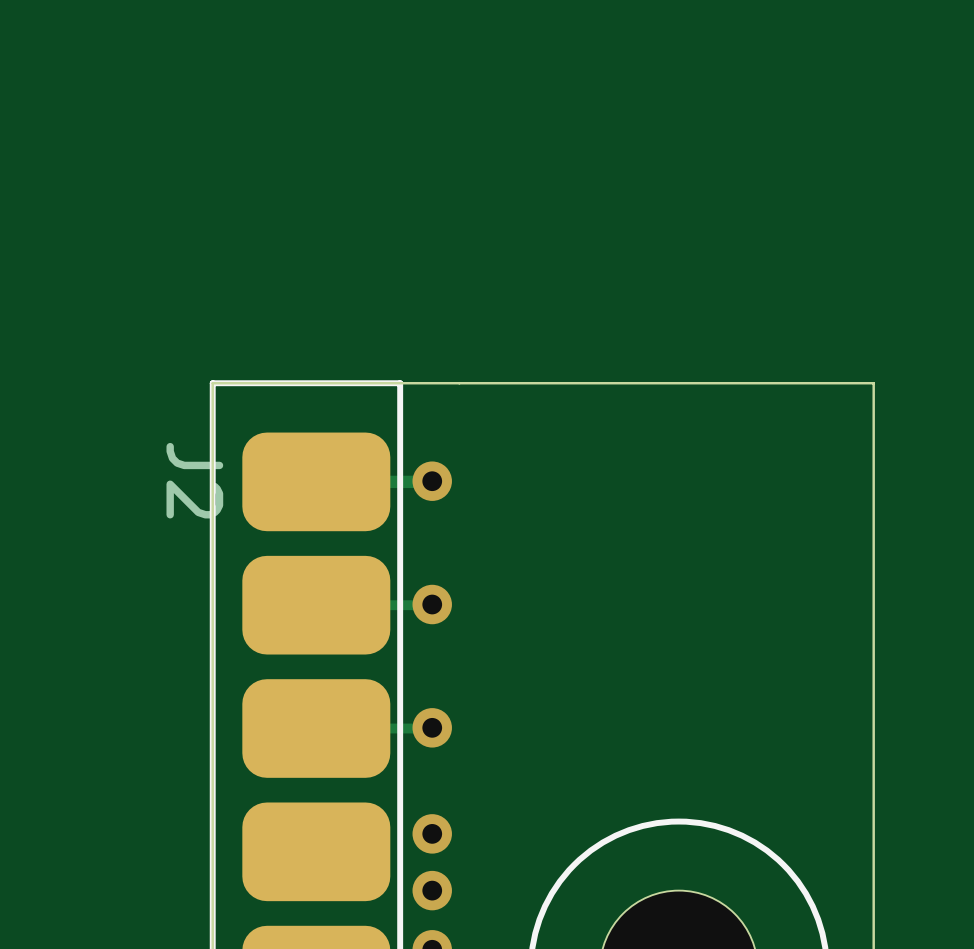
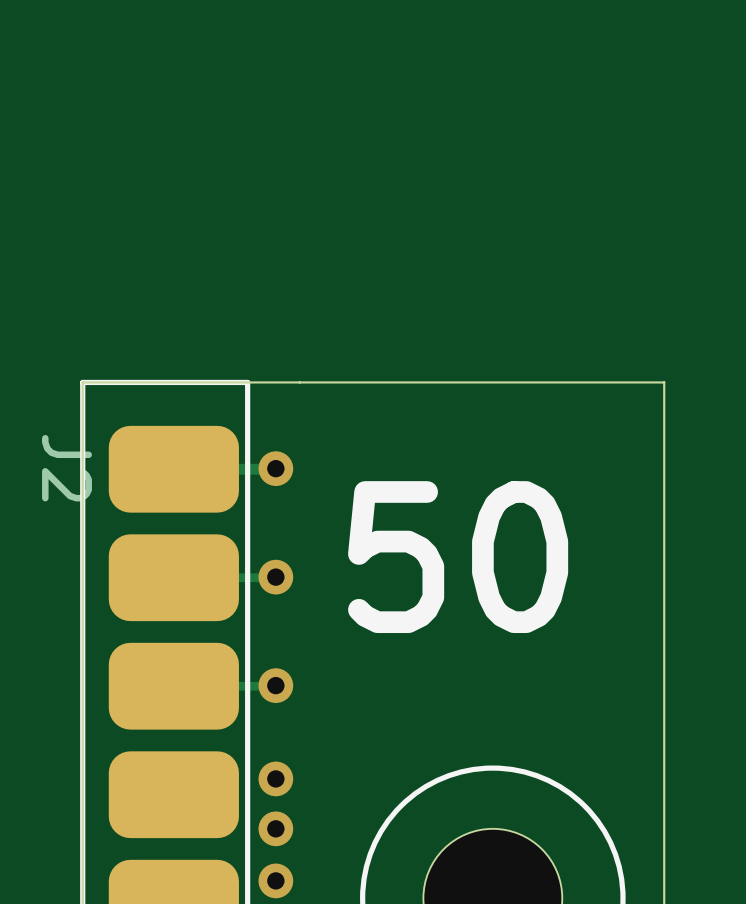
text: none -> 50 (458, 557)

